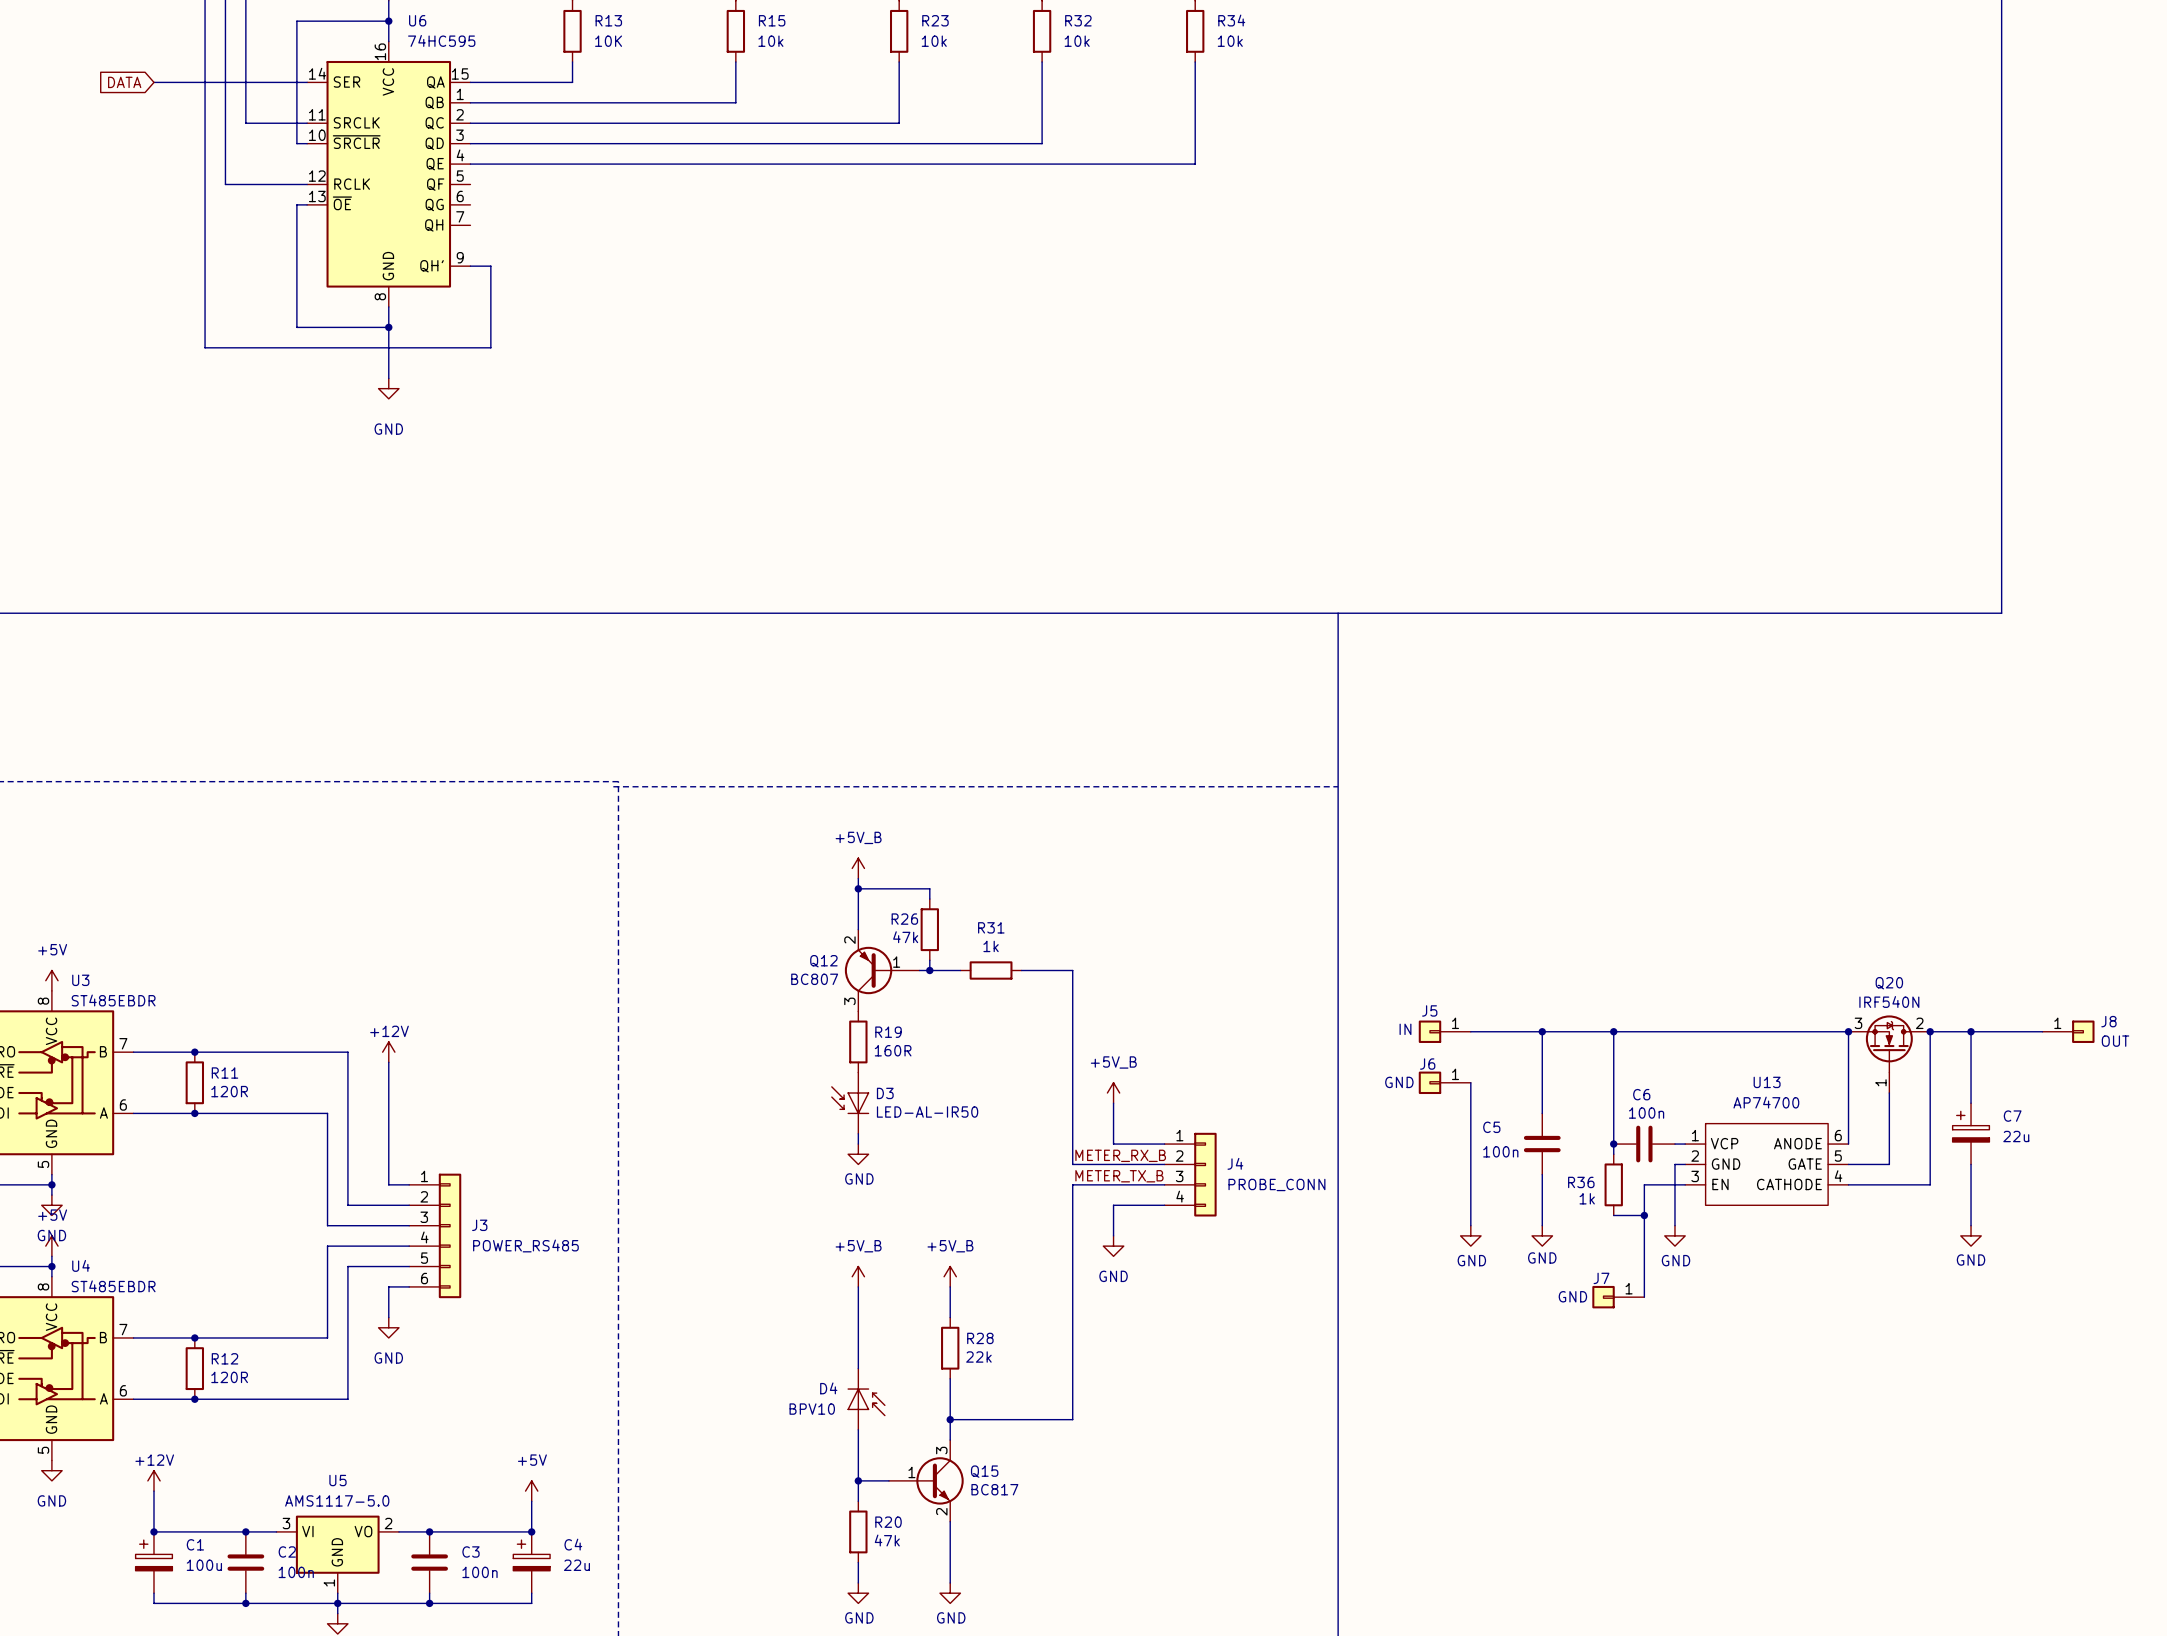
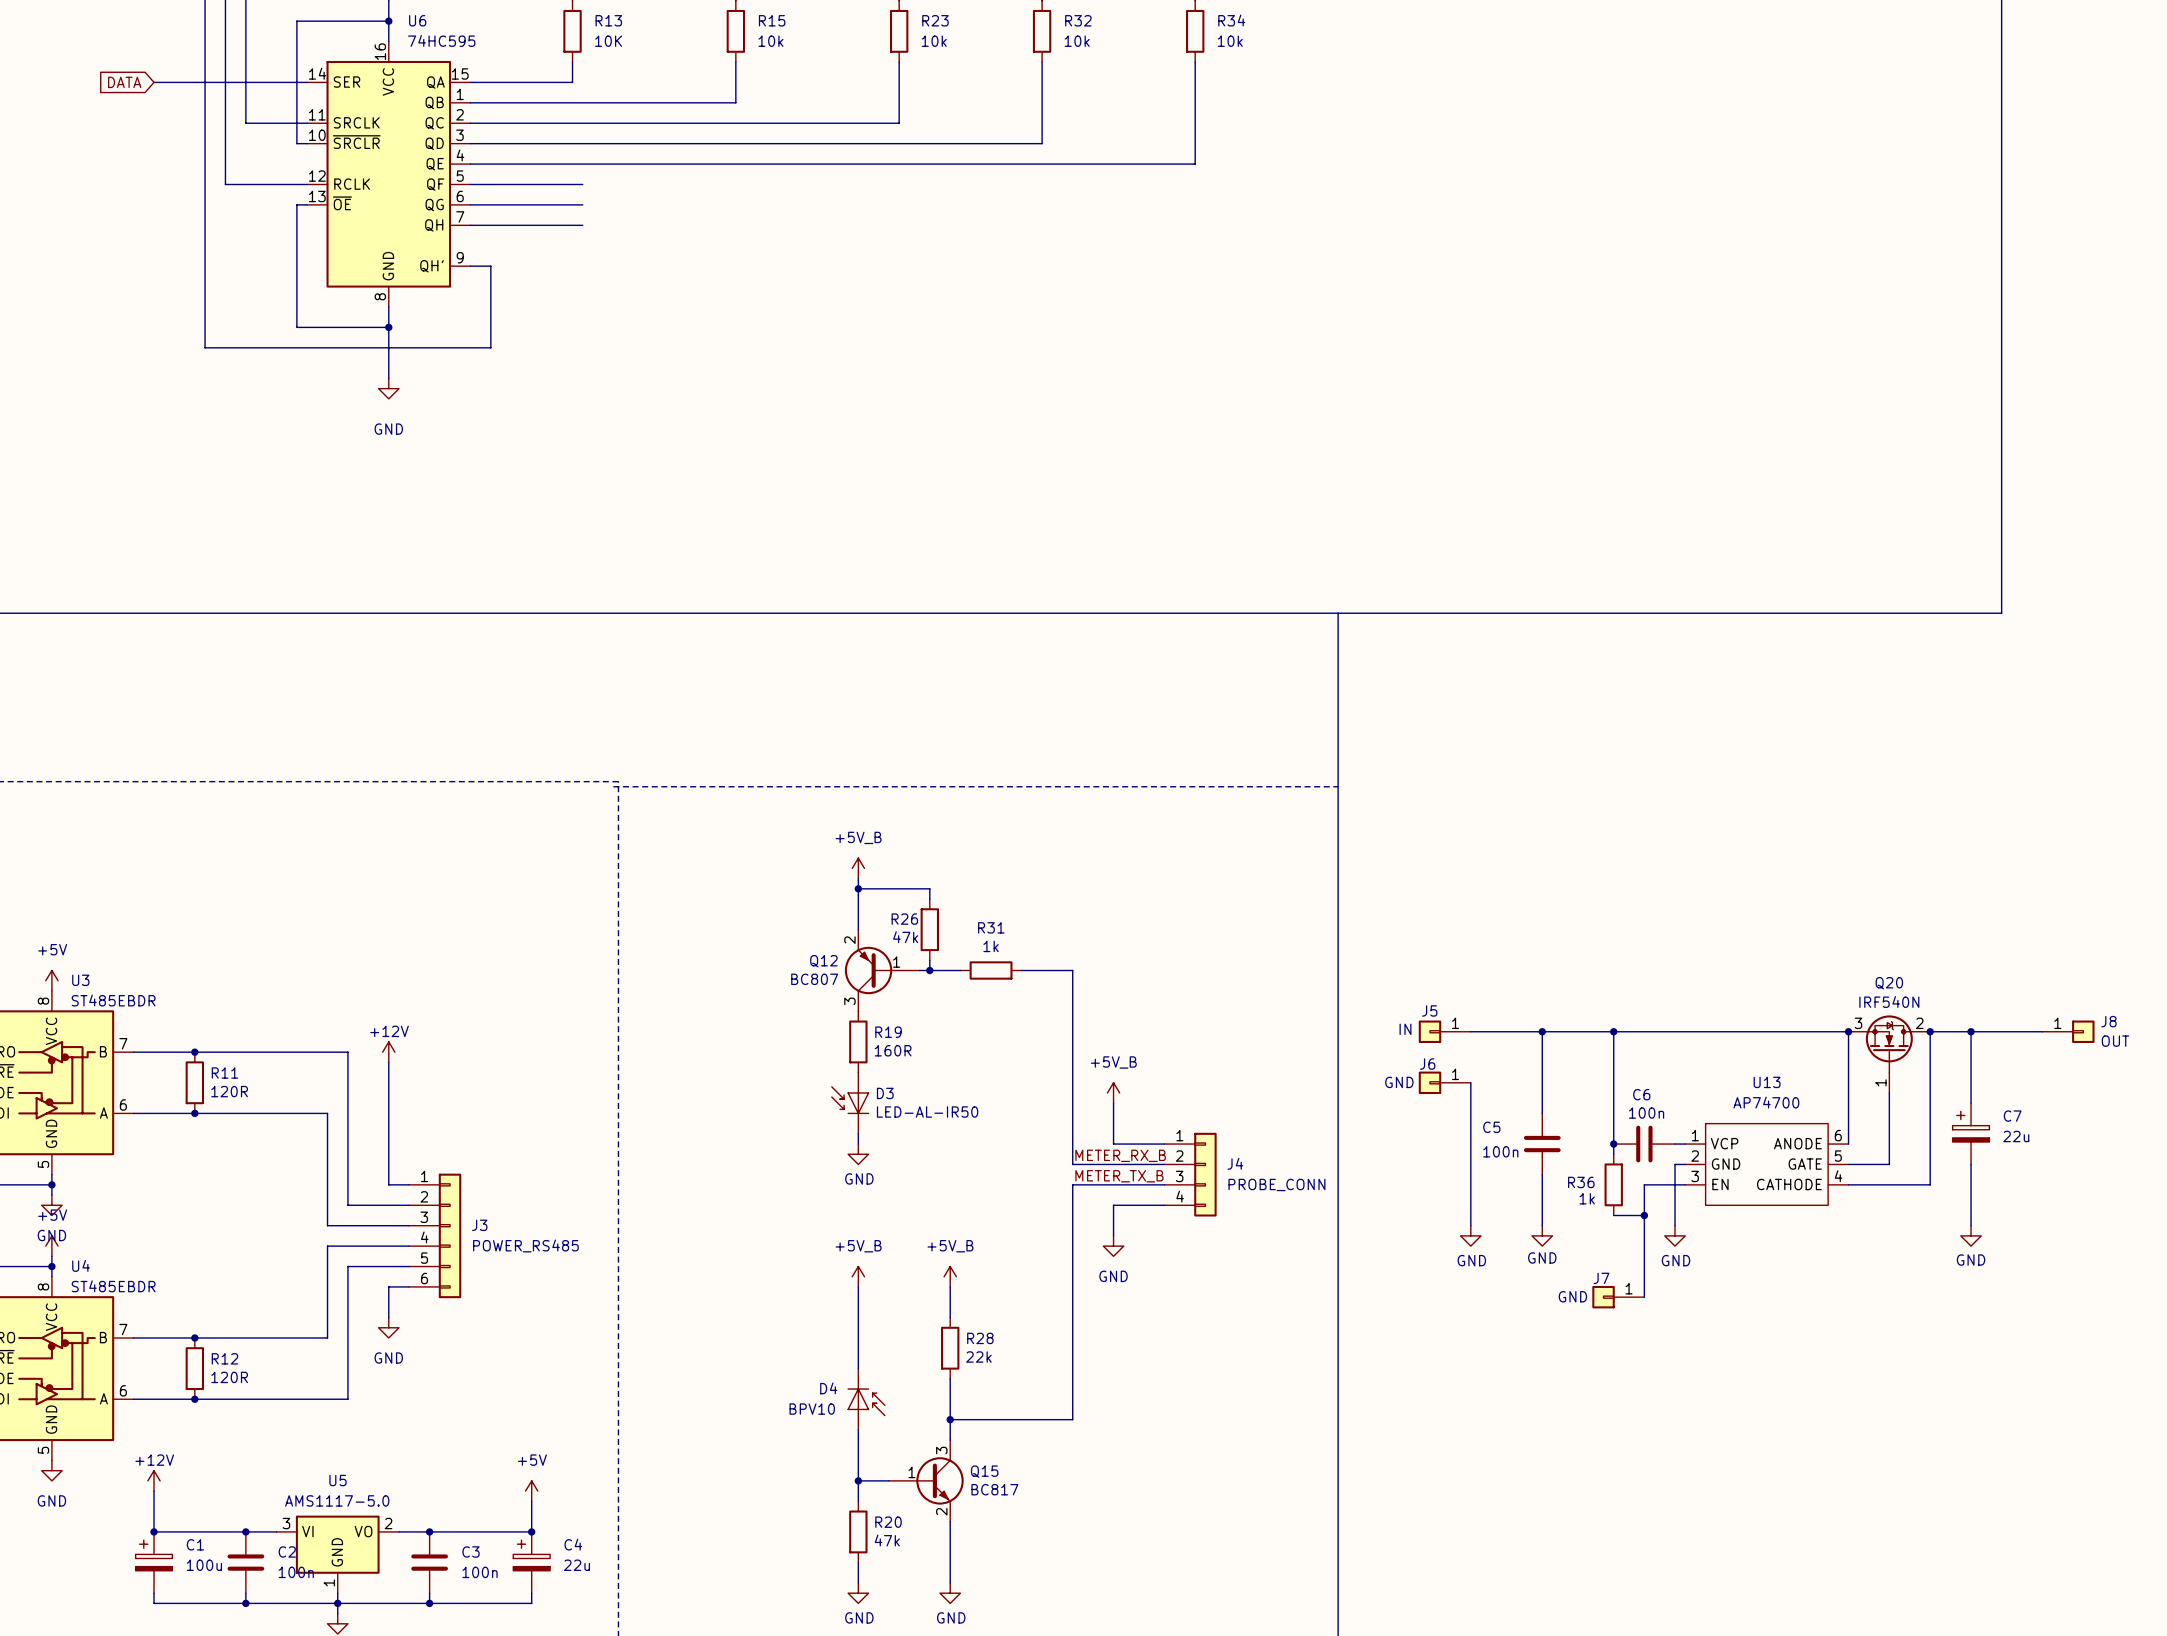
wire: none -> (470, 184) (582, 184)
wire: none -> (470, 204) (582, 204)
wire: none -> (470, 225) (582, 225)

